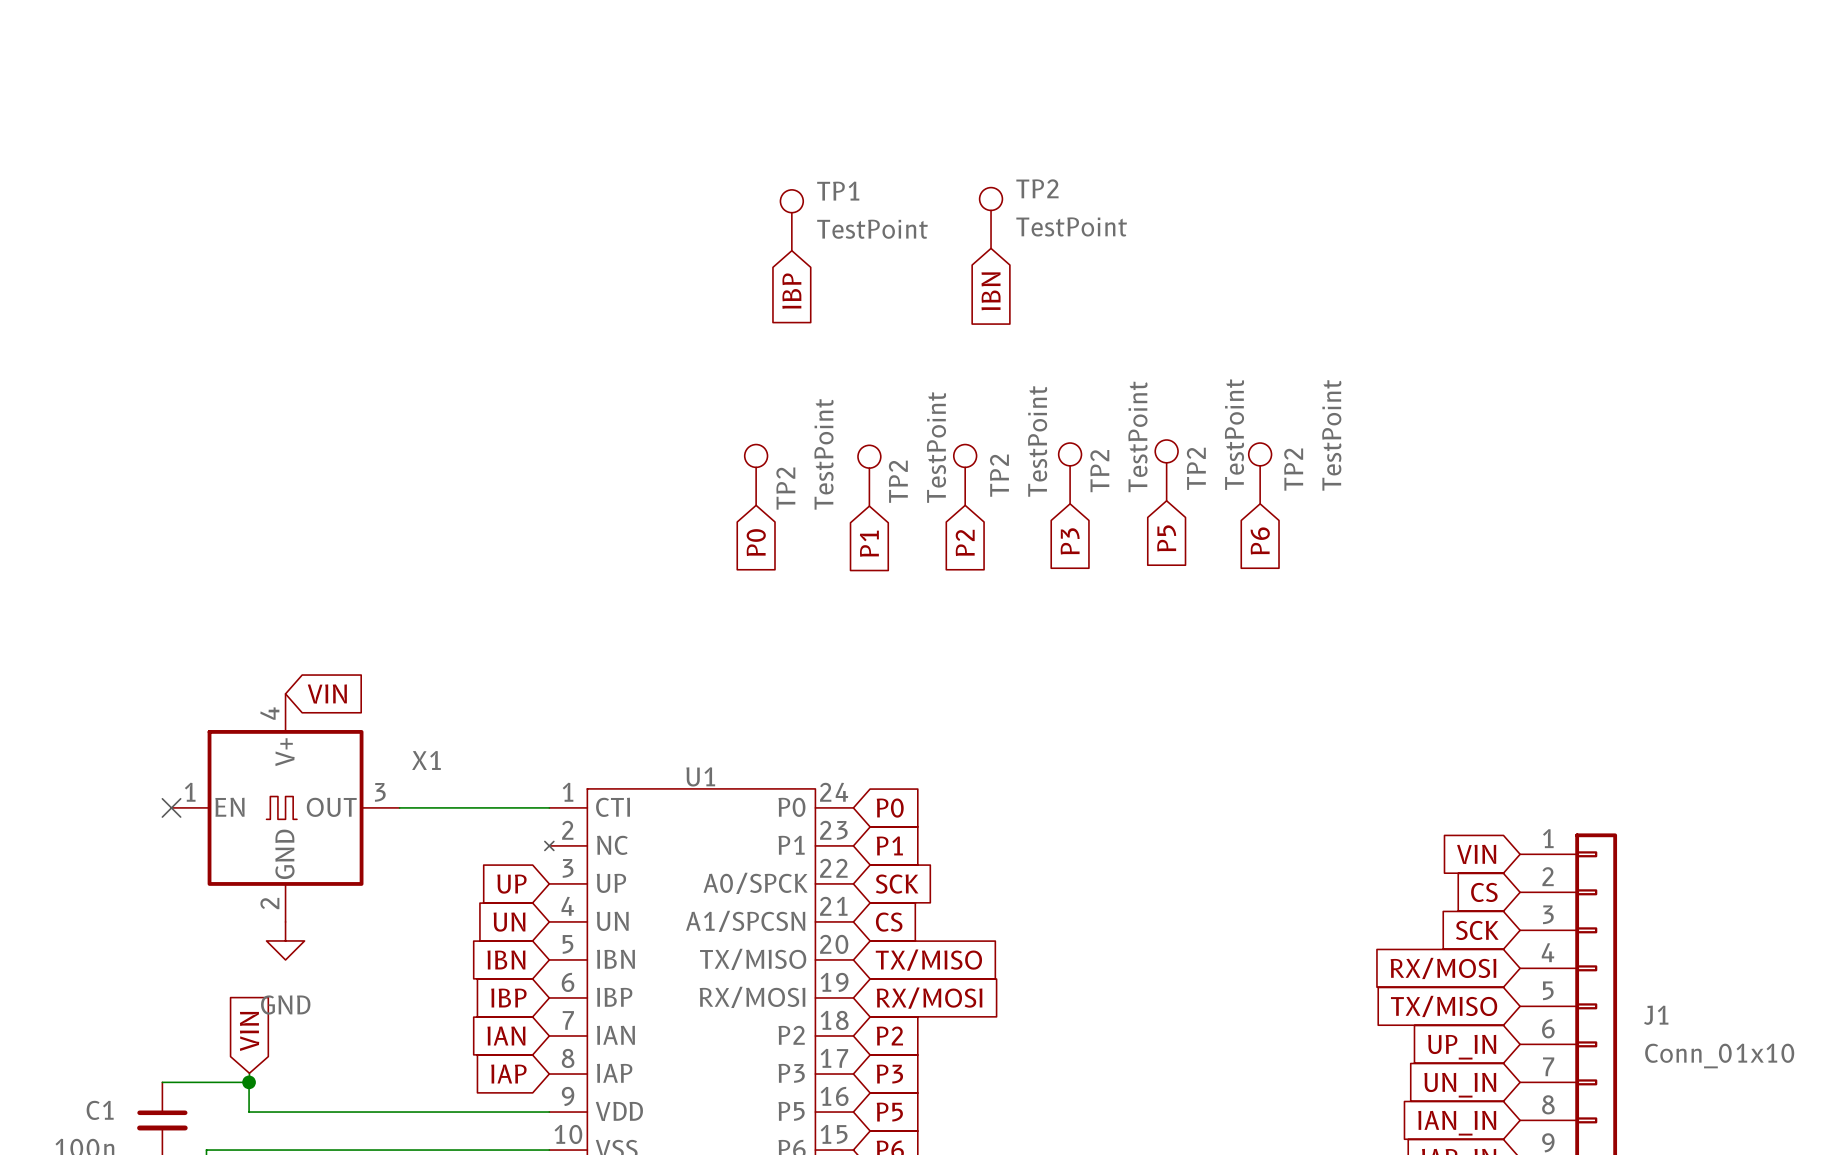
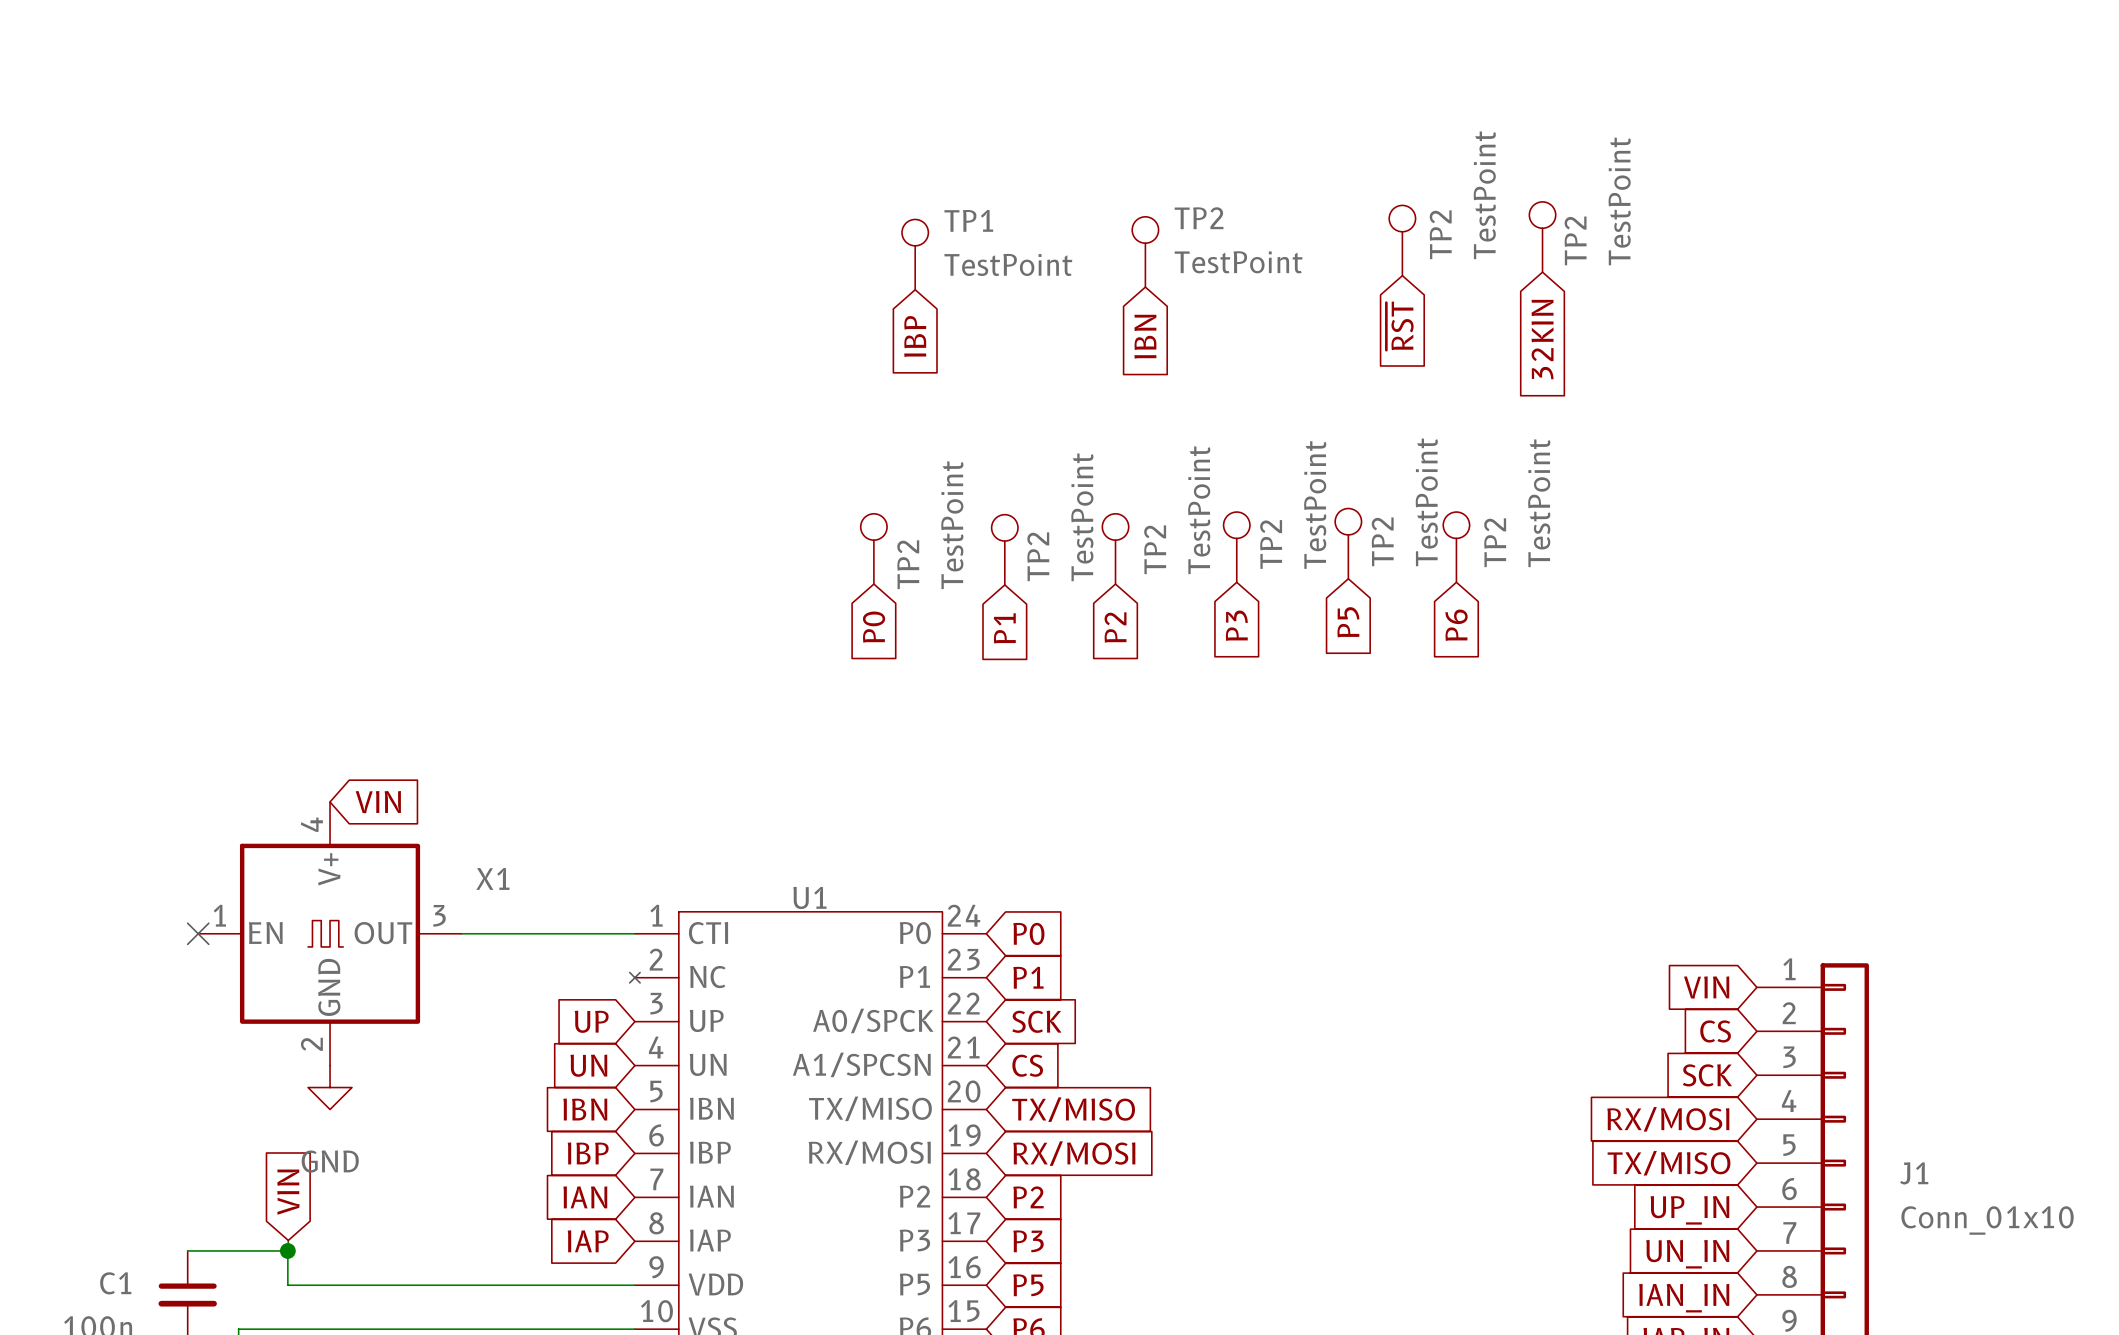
TP2: none -> TestPoint (1542, 237)
TP2: none -> TestPoint (1402, 240)
global label: none -> ~{RST} (1399, 325)
global label: none -> 32KIN (1542, 339)

